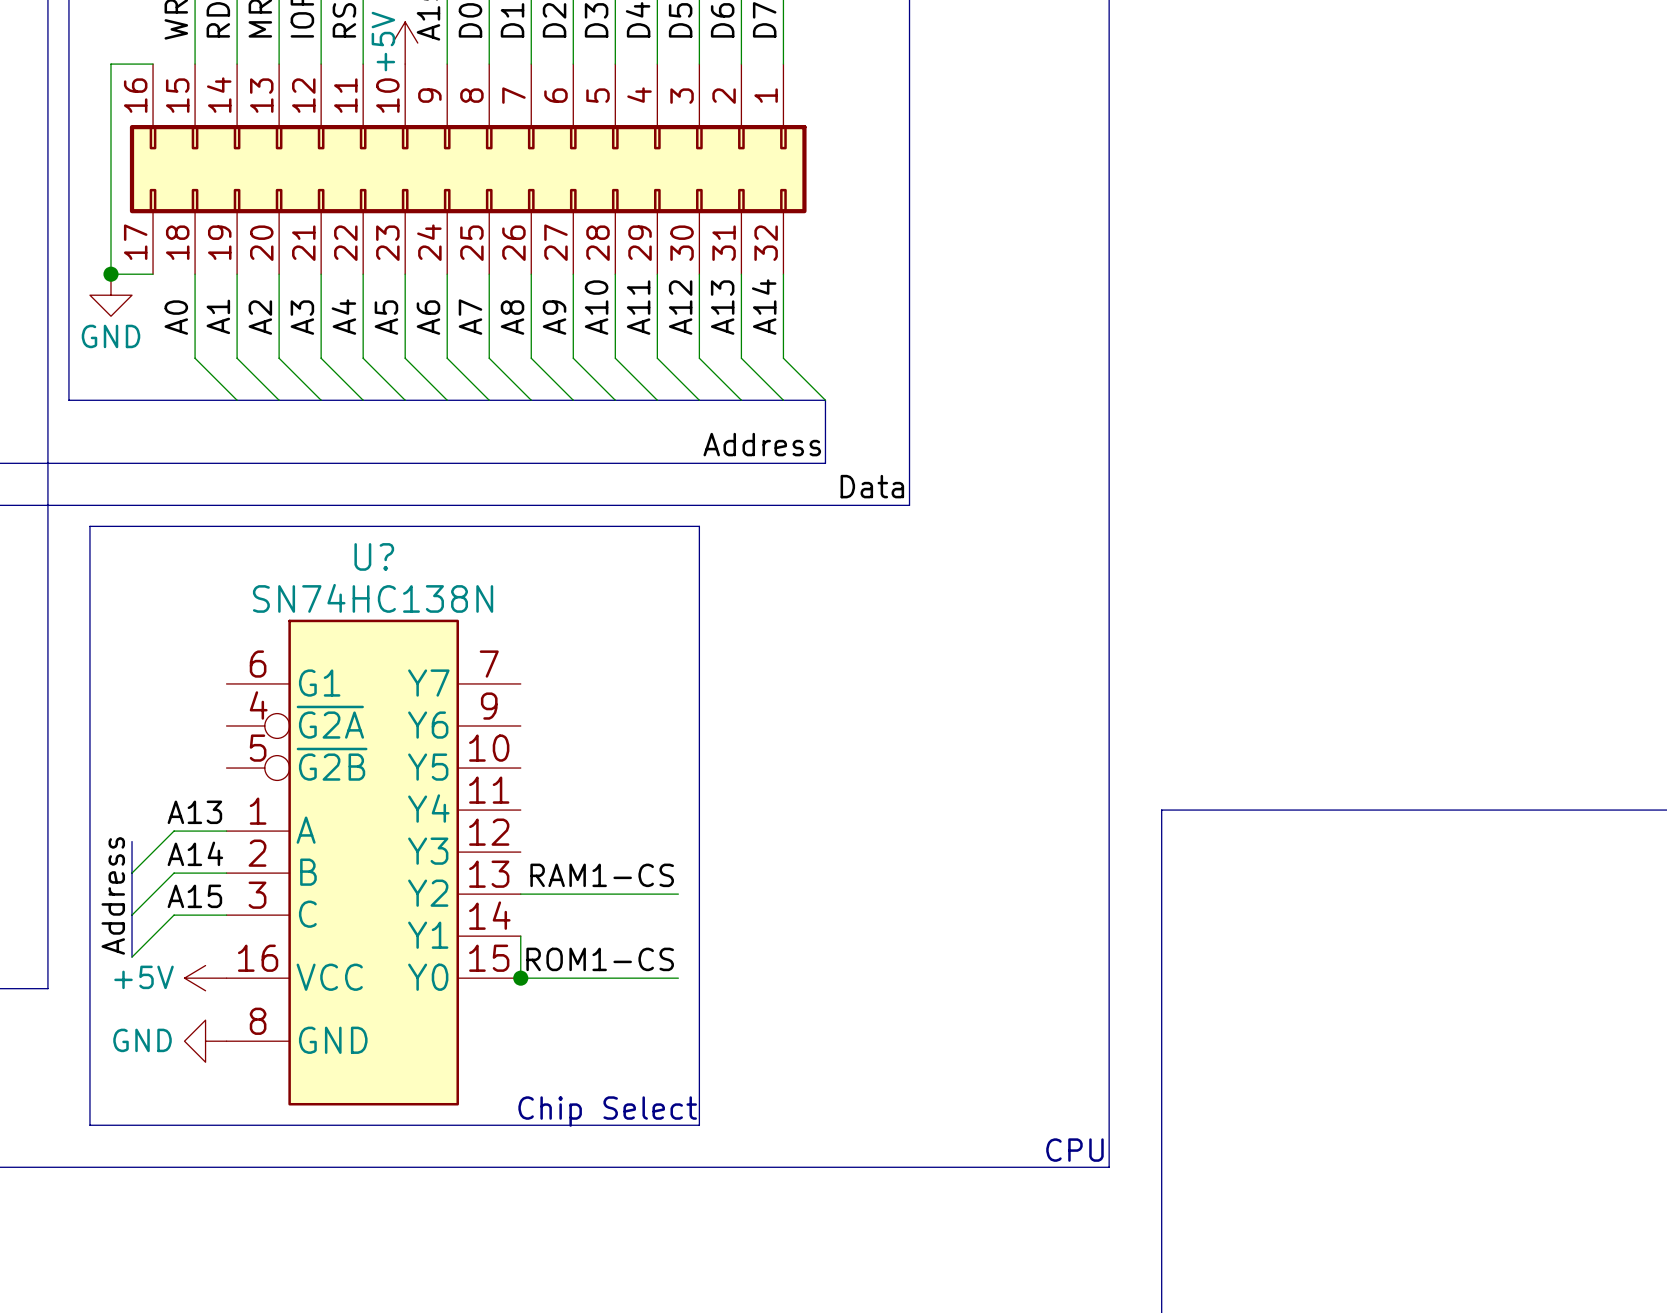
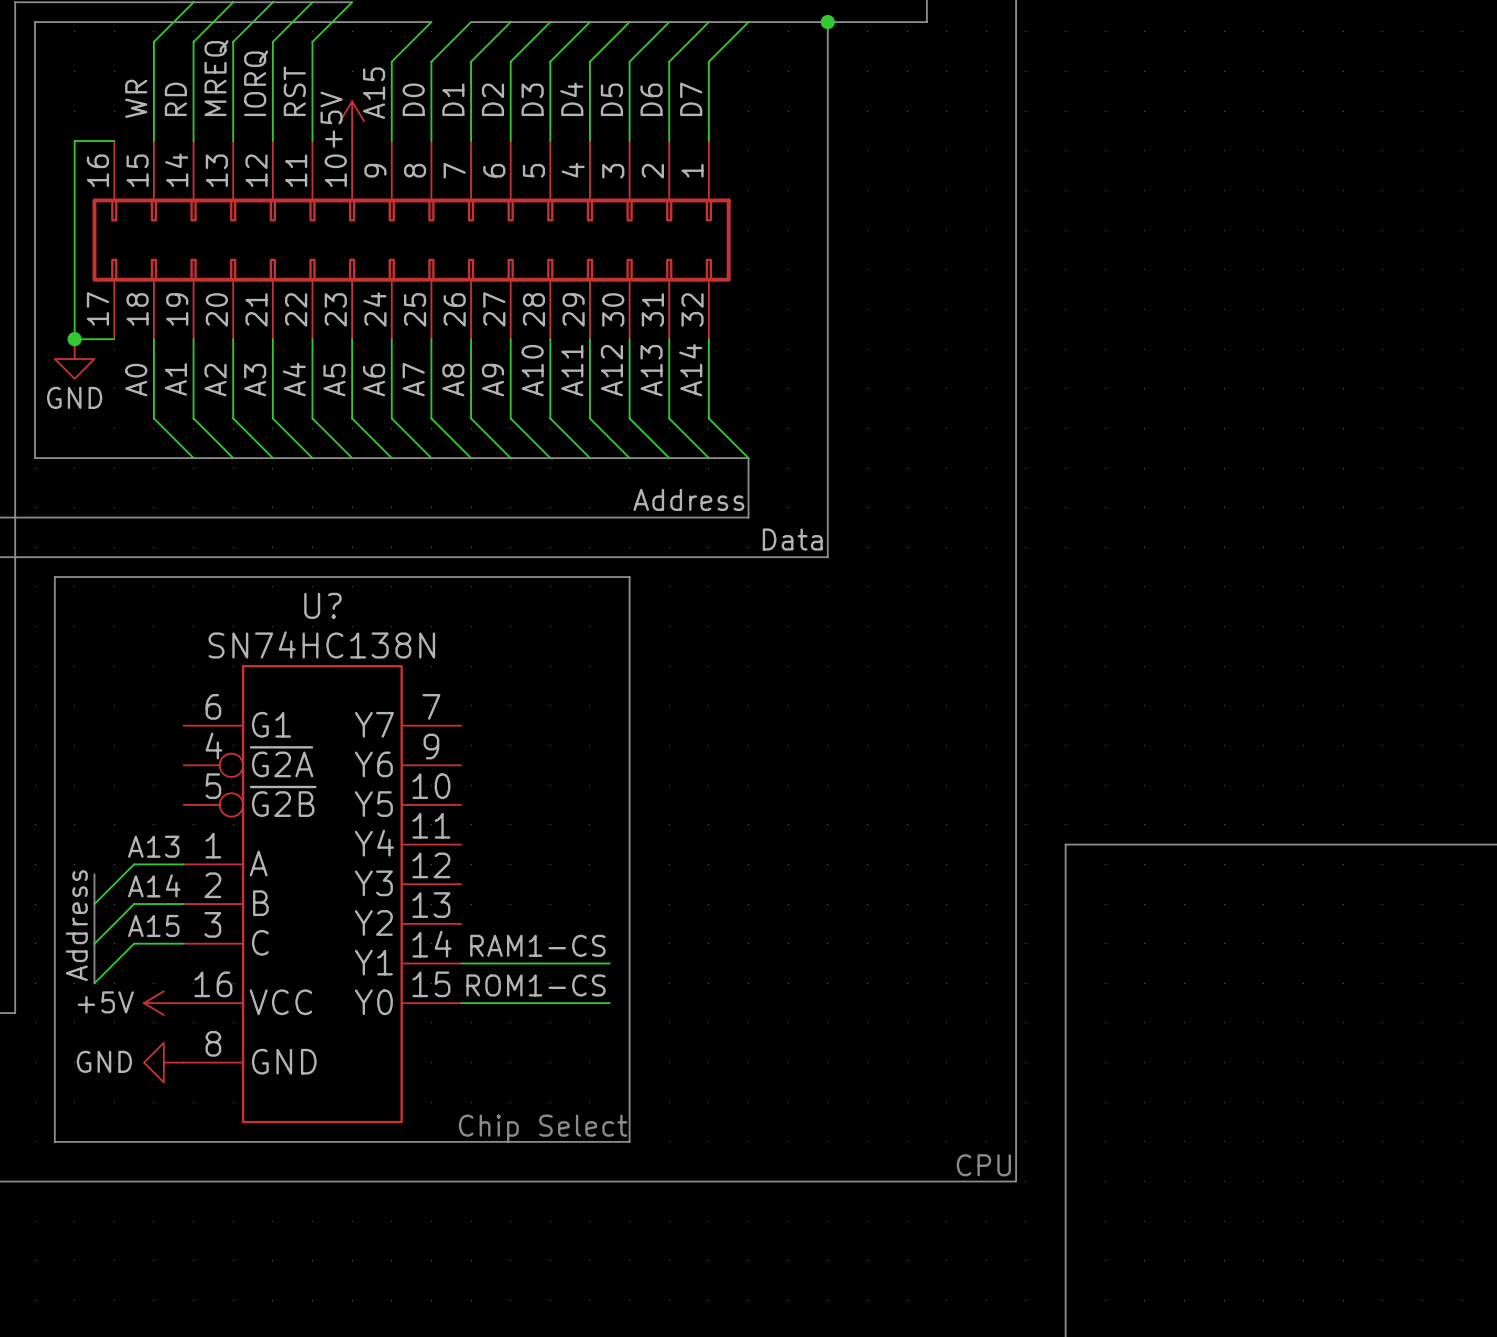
label position: RAM1-CS (602, 875) -> RAM1-CS (537, 945)
wire: (520, 894) (678, 894) -> none
wire: (520, 936) (520, 978) -> (461, 963) (609, 963)
junction: (520, 978) -> none

